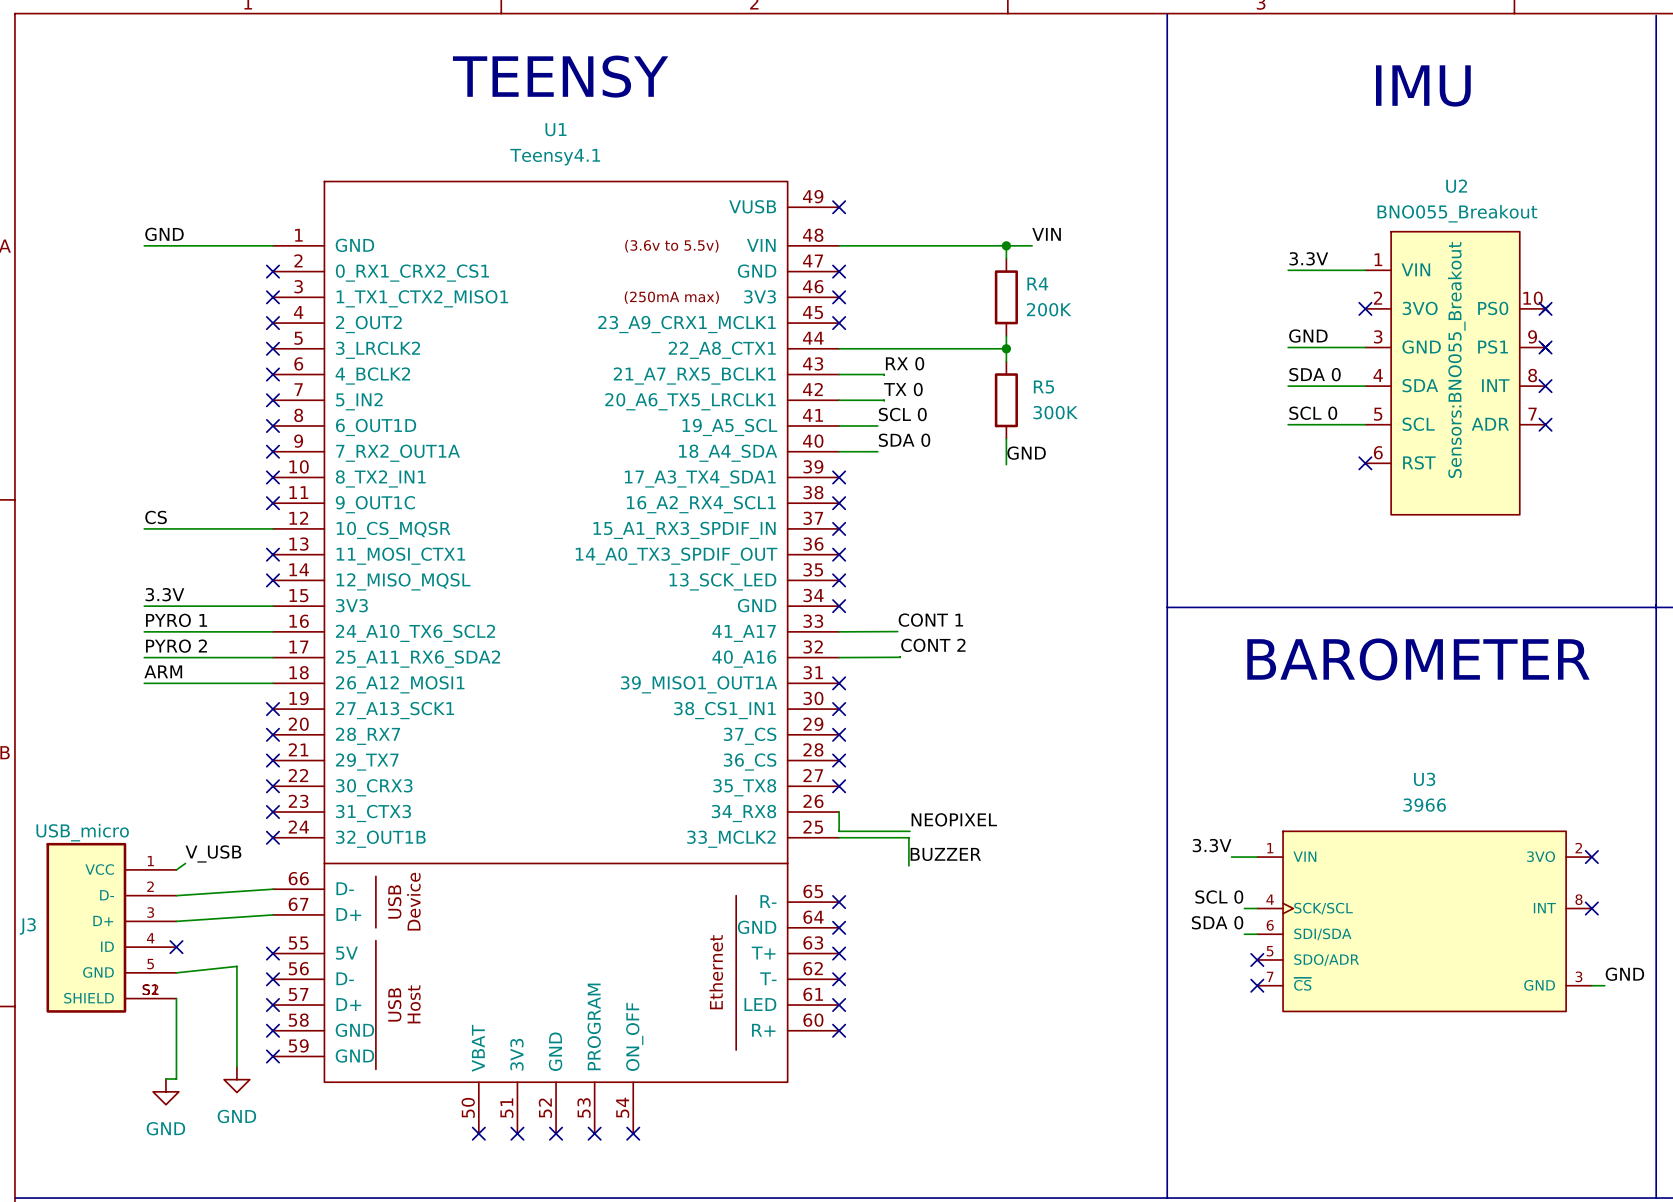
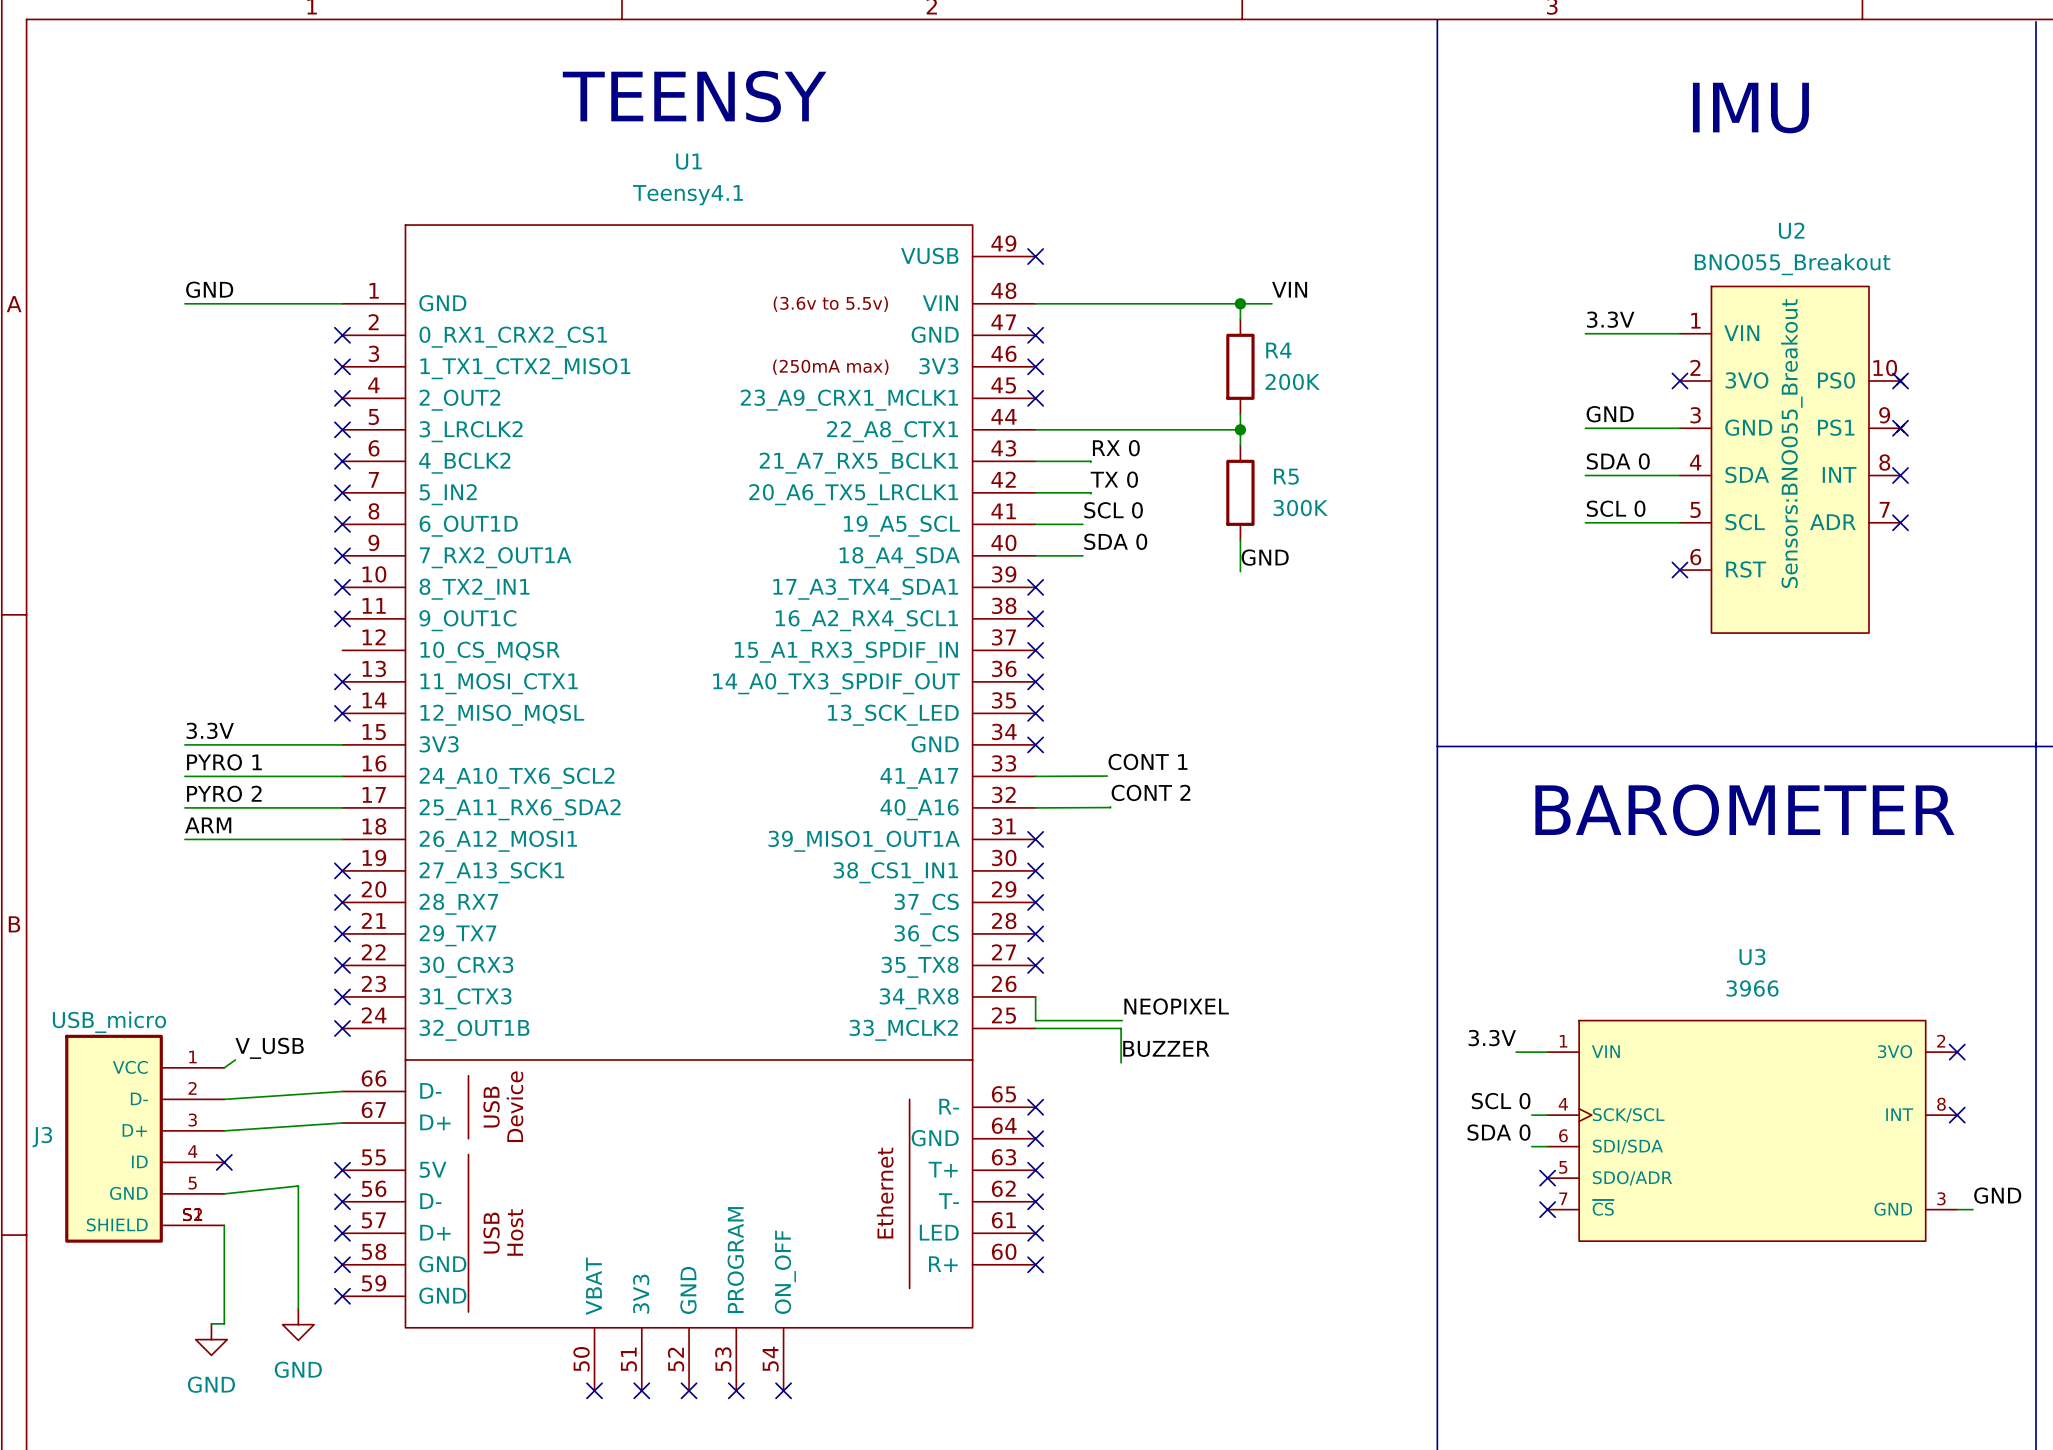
label: CS (156, 517) -> none
wire: (144, 528) (272, 528) -> none

